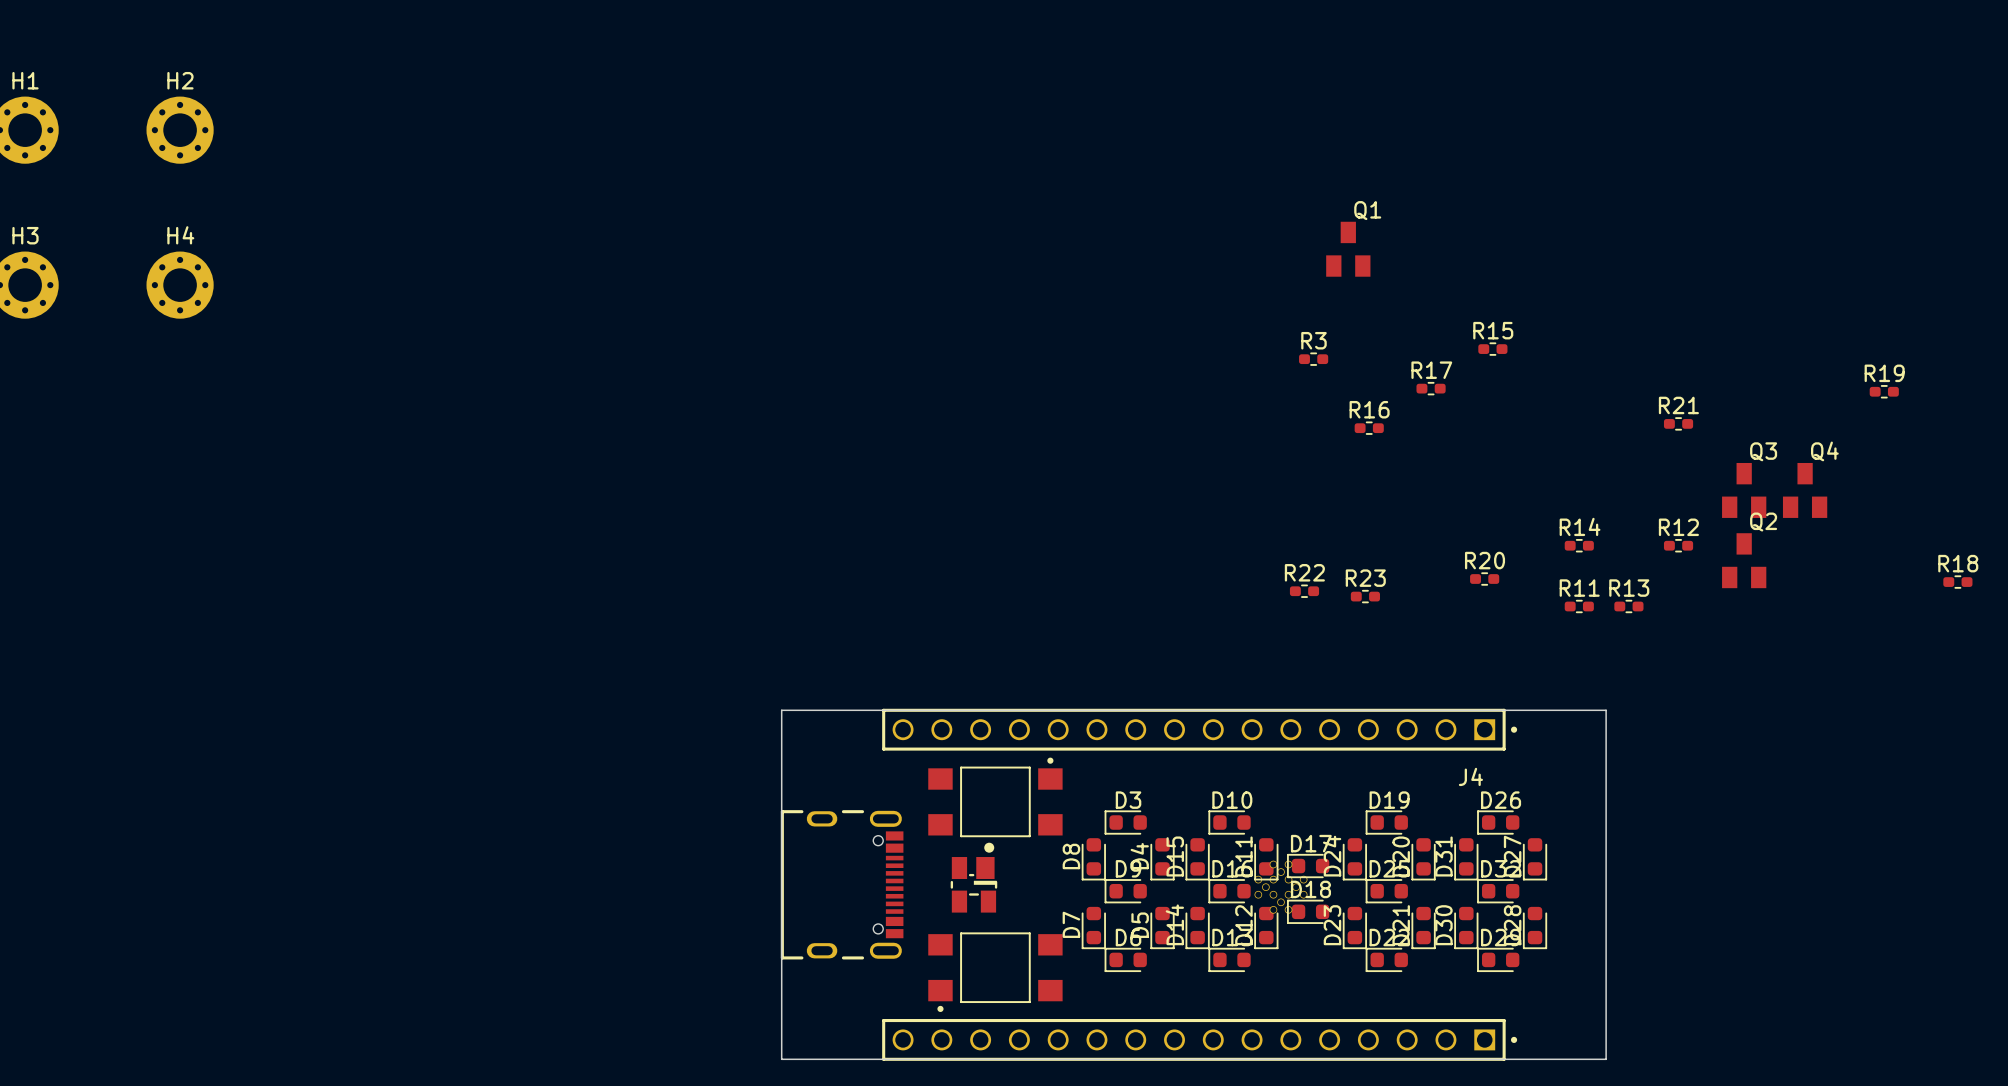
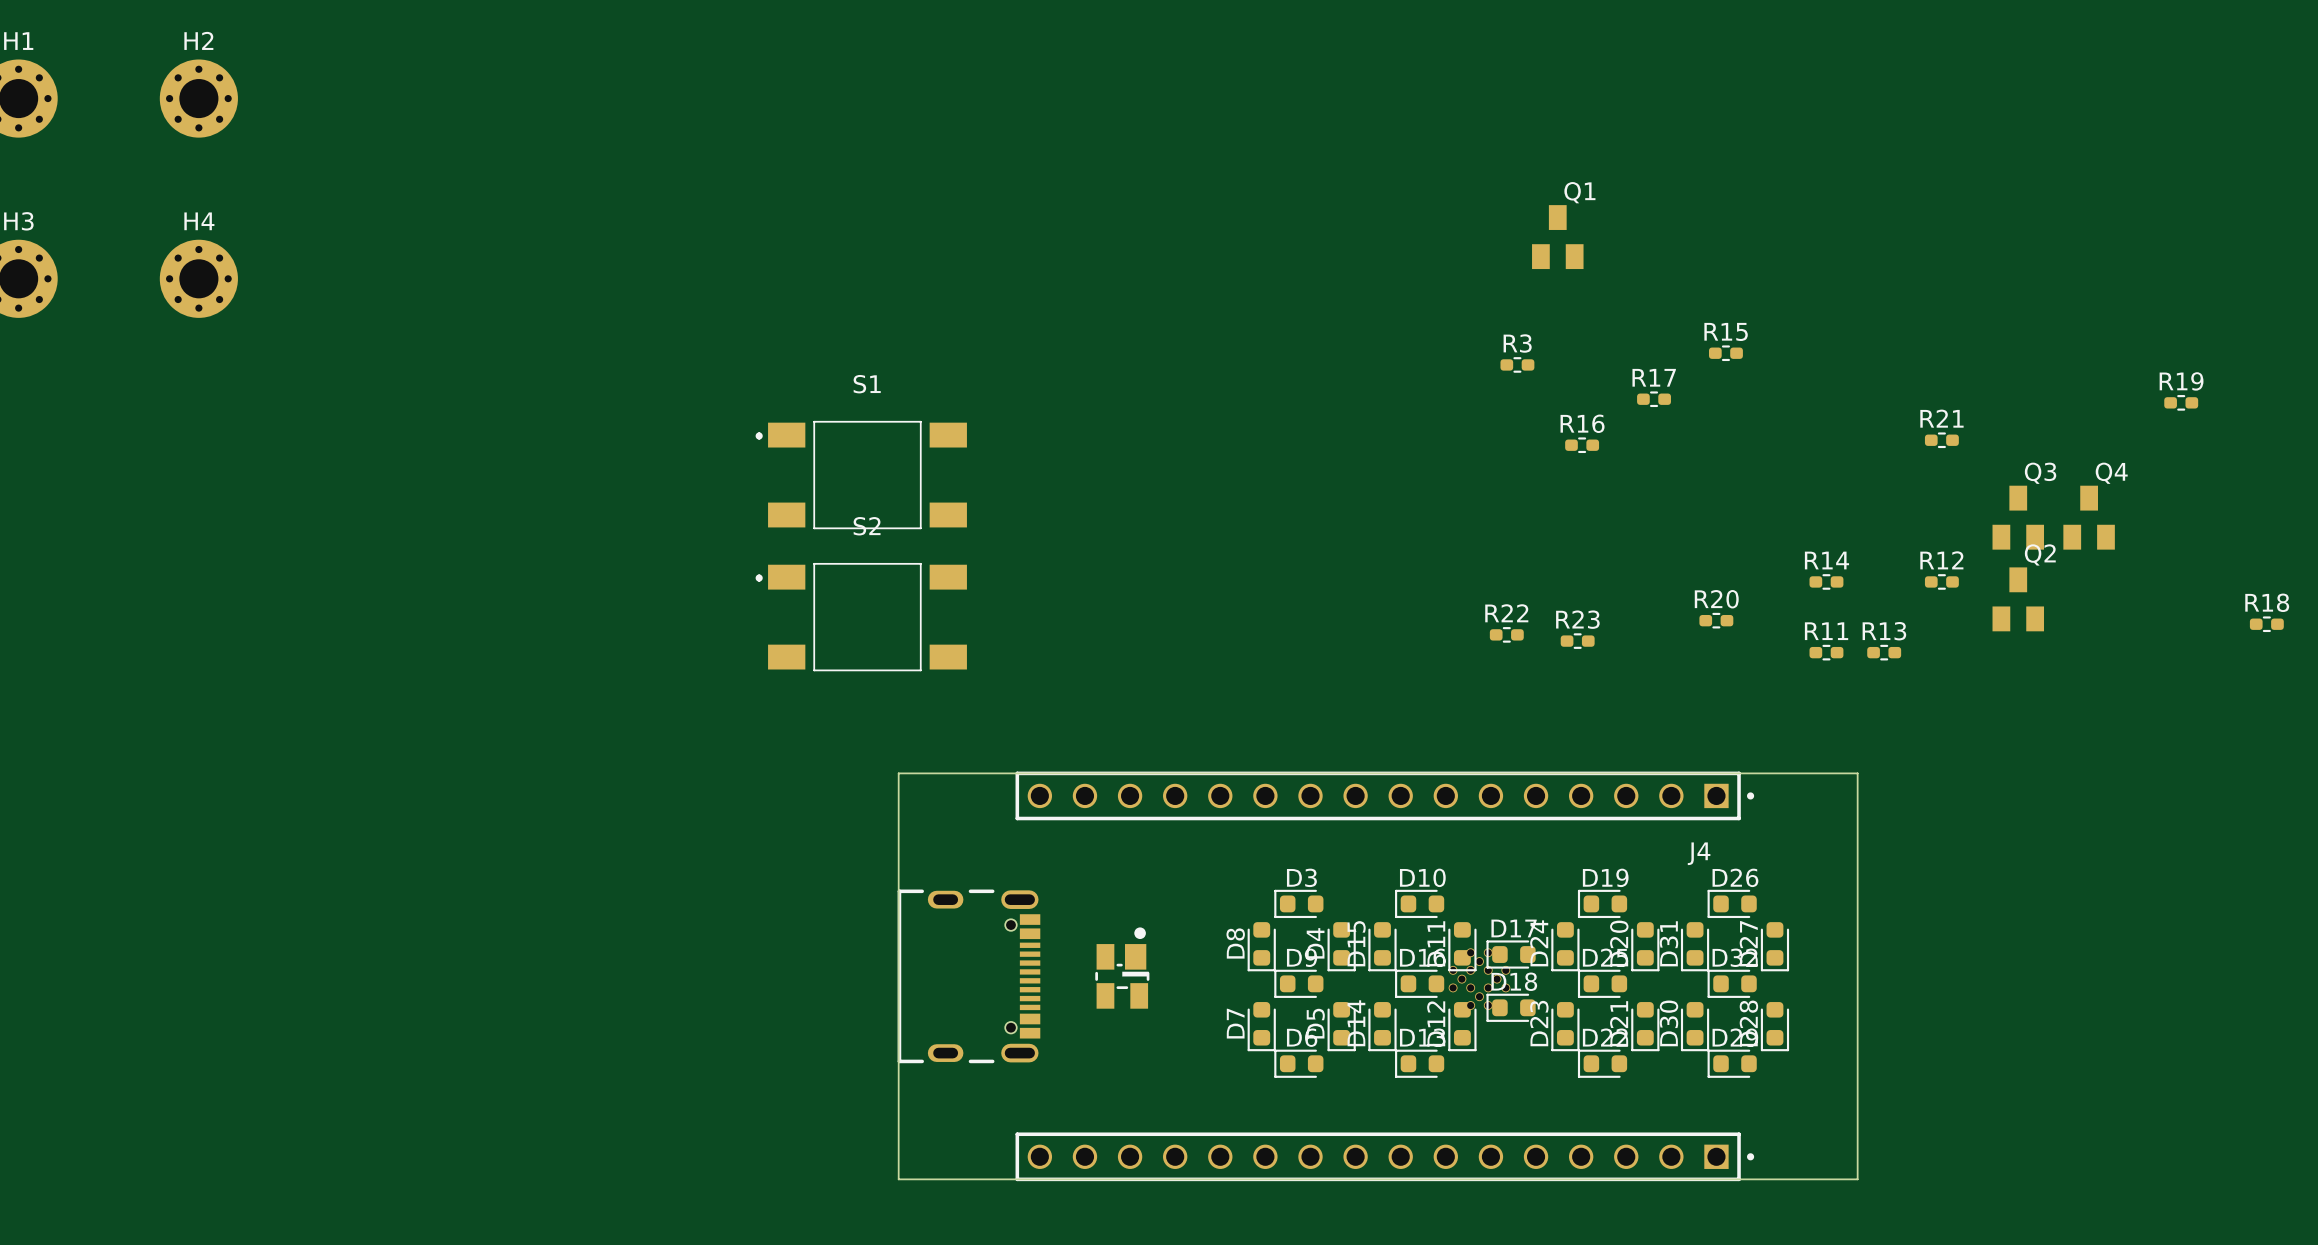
S1: none -> (861, 475)
S2: none -> (861, 617)
part: (995, 797) -> none
part: (995, 972) -> none

